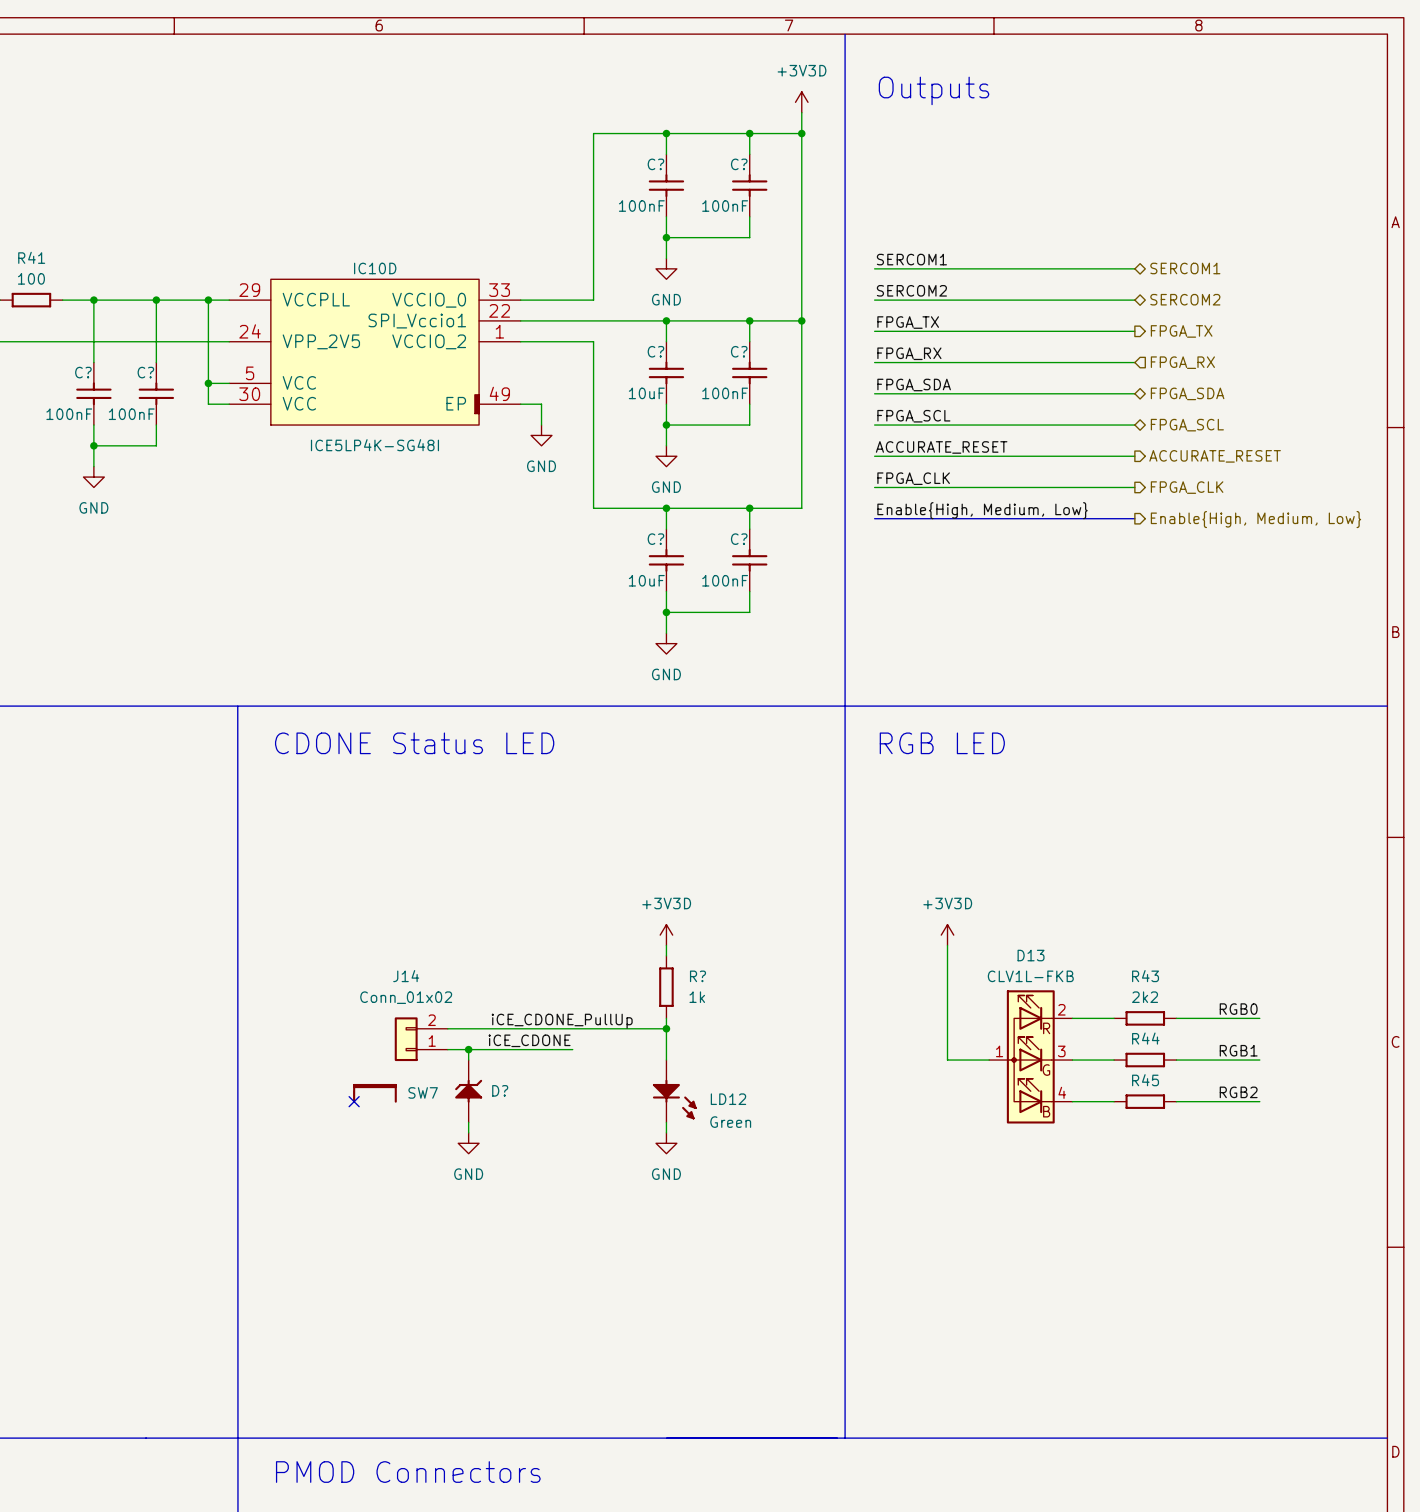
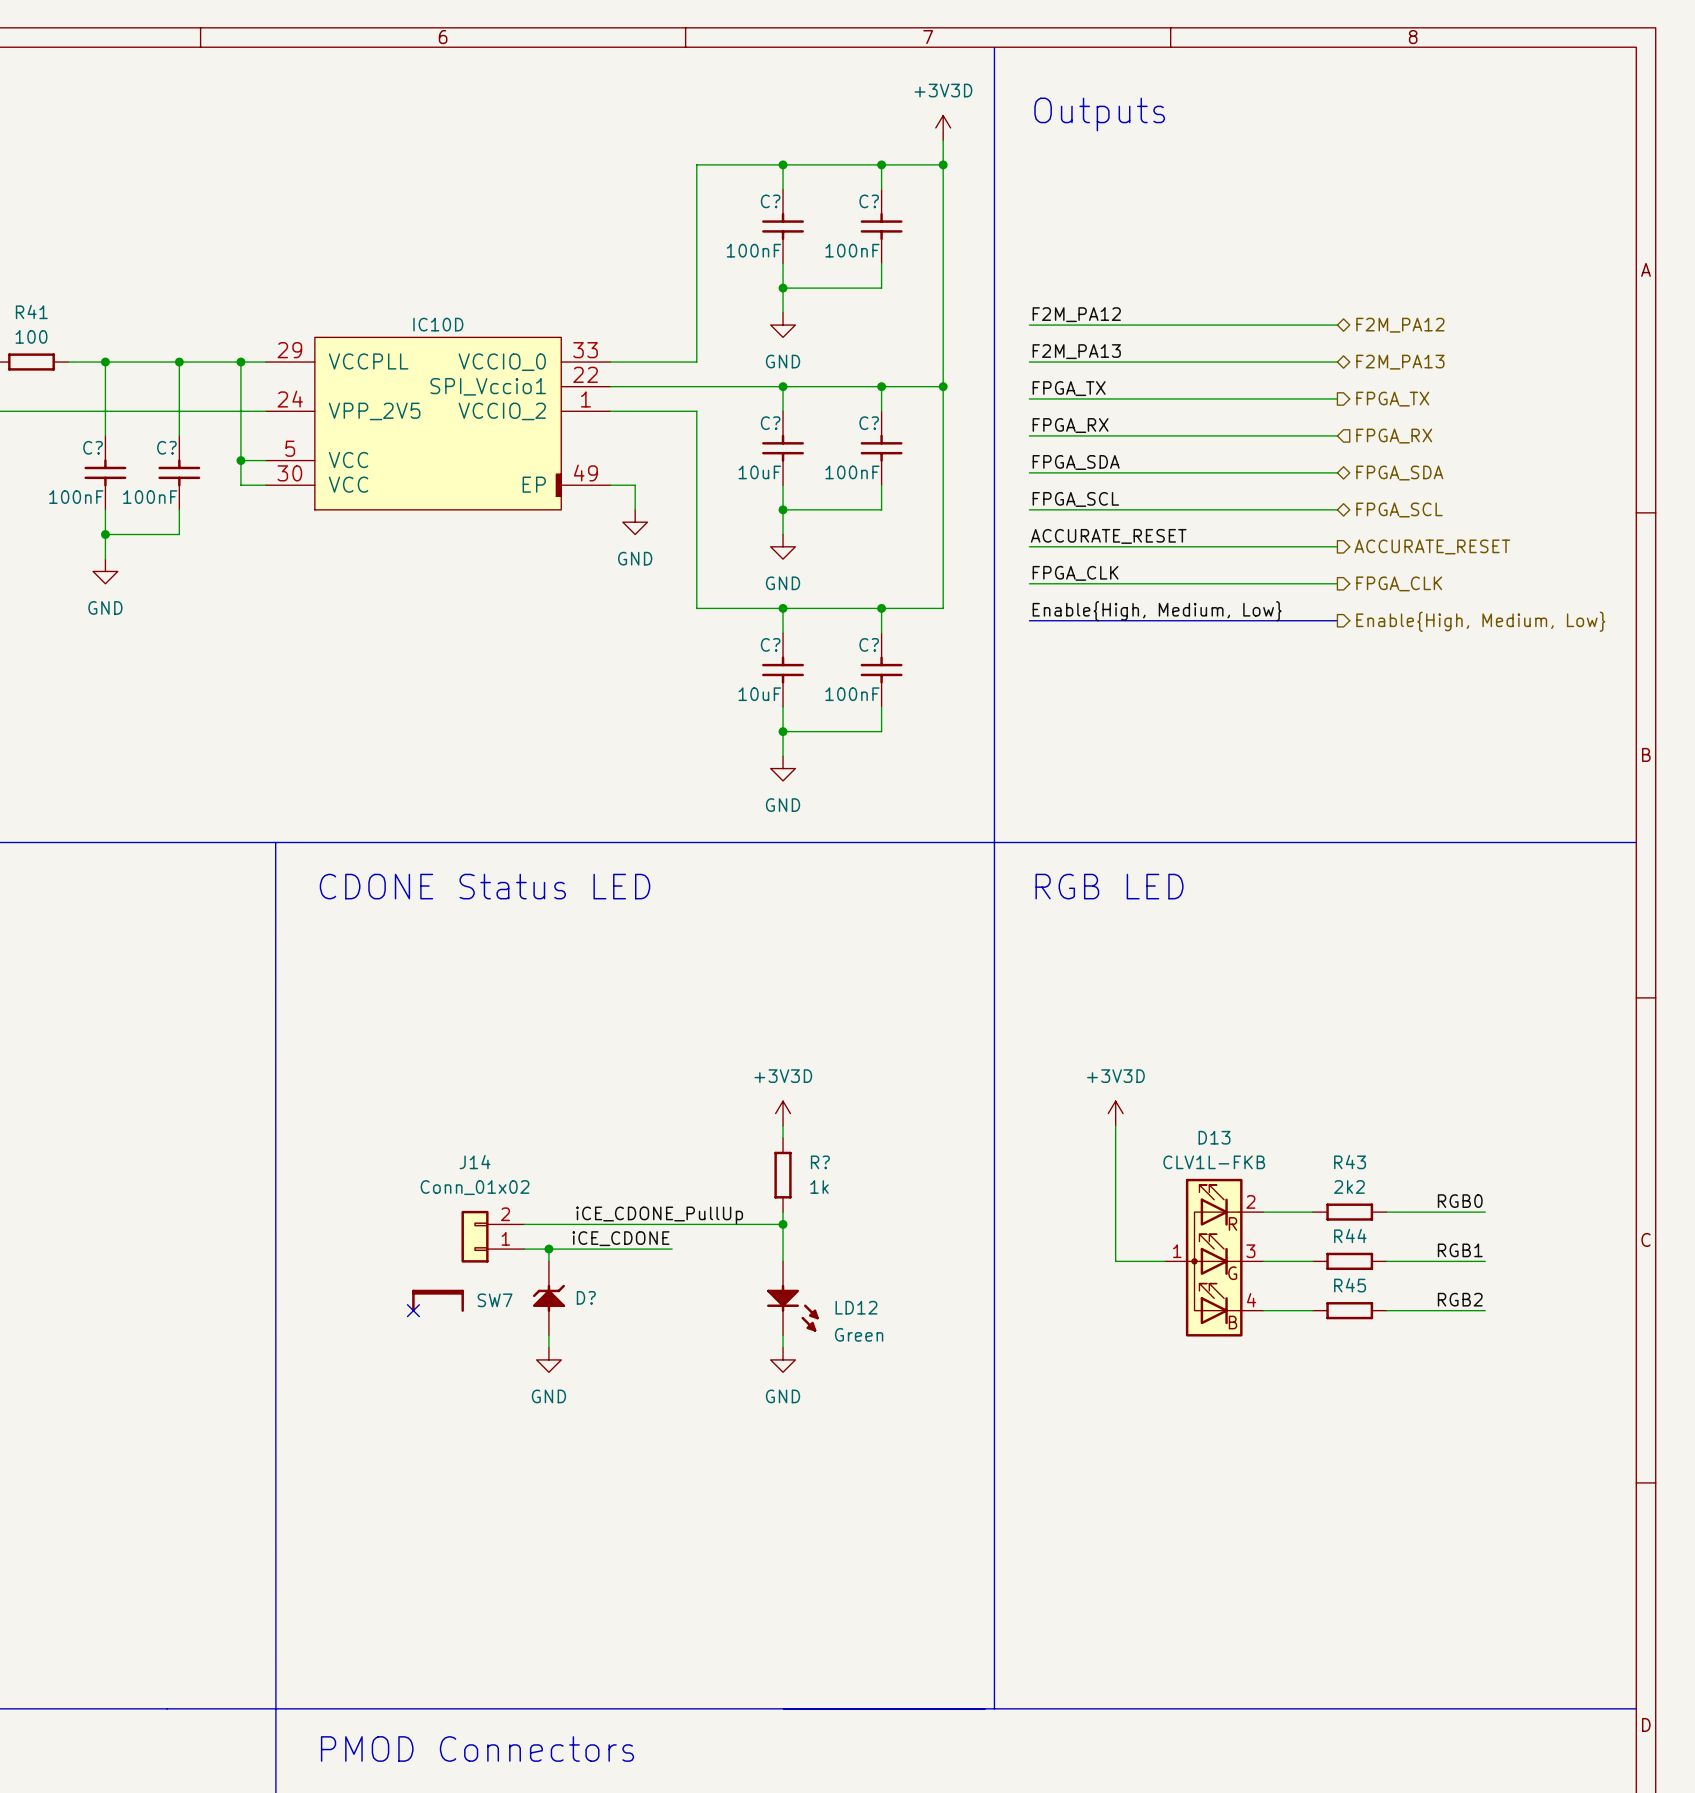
label: SERCOM1 (911, 259) -> F2M_PA12 (1076, 314)
hierarchical label: SERCOM1 (1185, 268) -> F2M_PA12 (1400, 325)
label: SERCOM2 (911, 290) -> F2M_PA13 (1076, 351)
hierarchical label: SERCOM2 (1185, 299) -> F2M_PA13 (1400, 362)
IC10D value: ICE5LP4K-SG48I (374, 445) -> none

